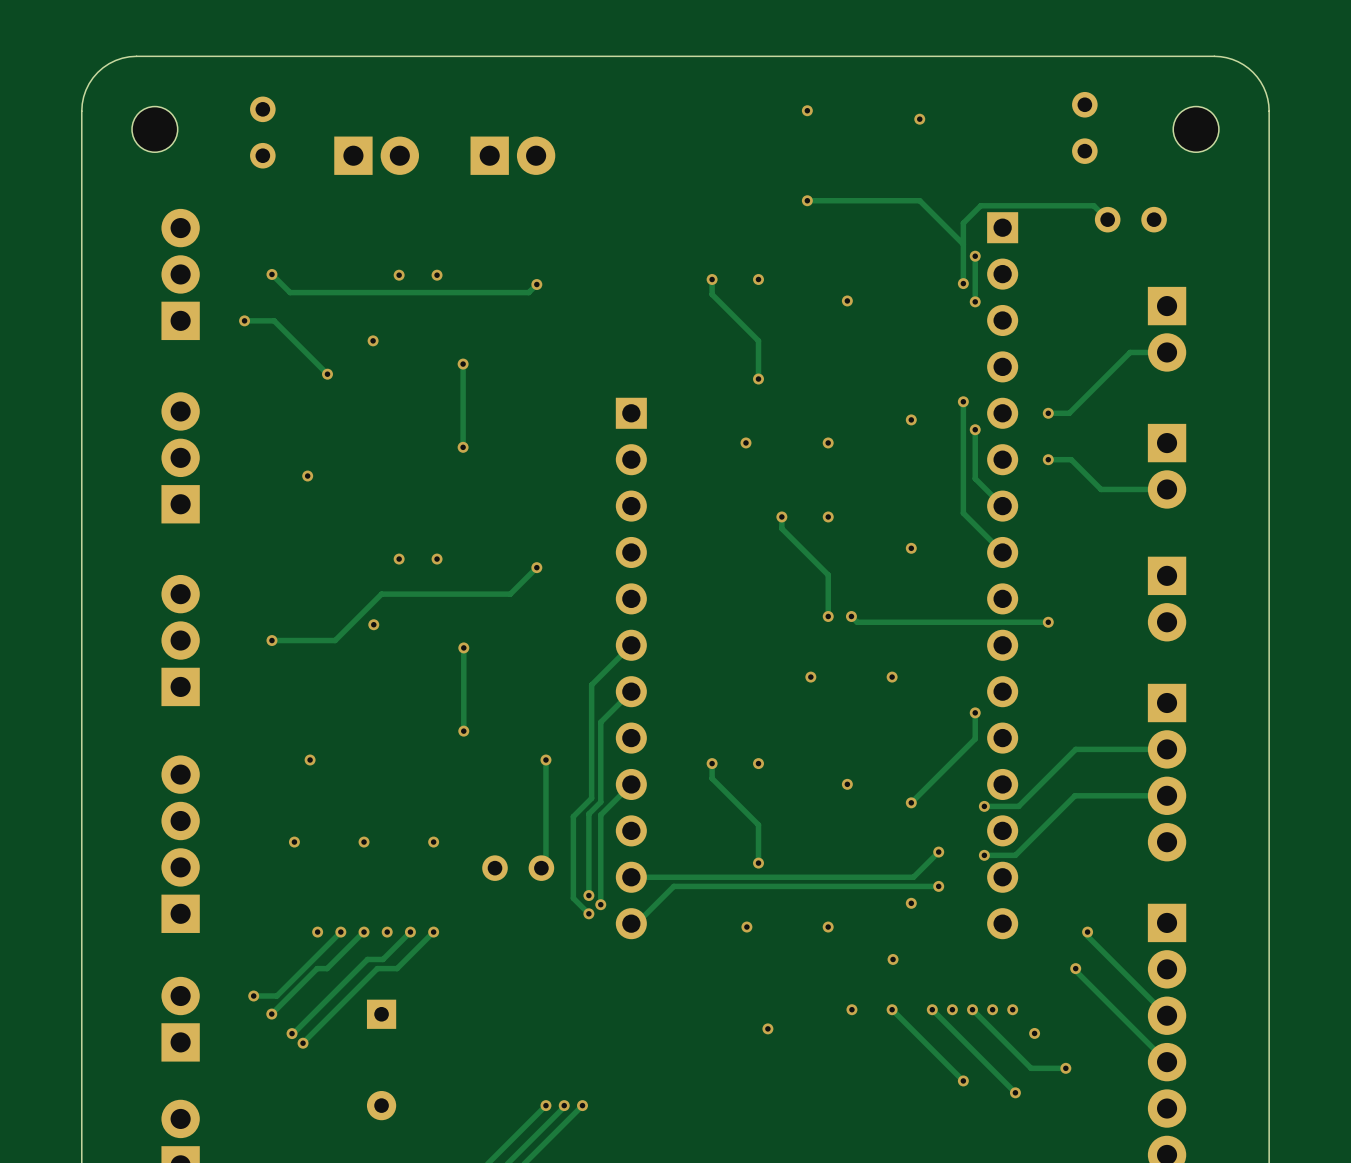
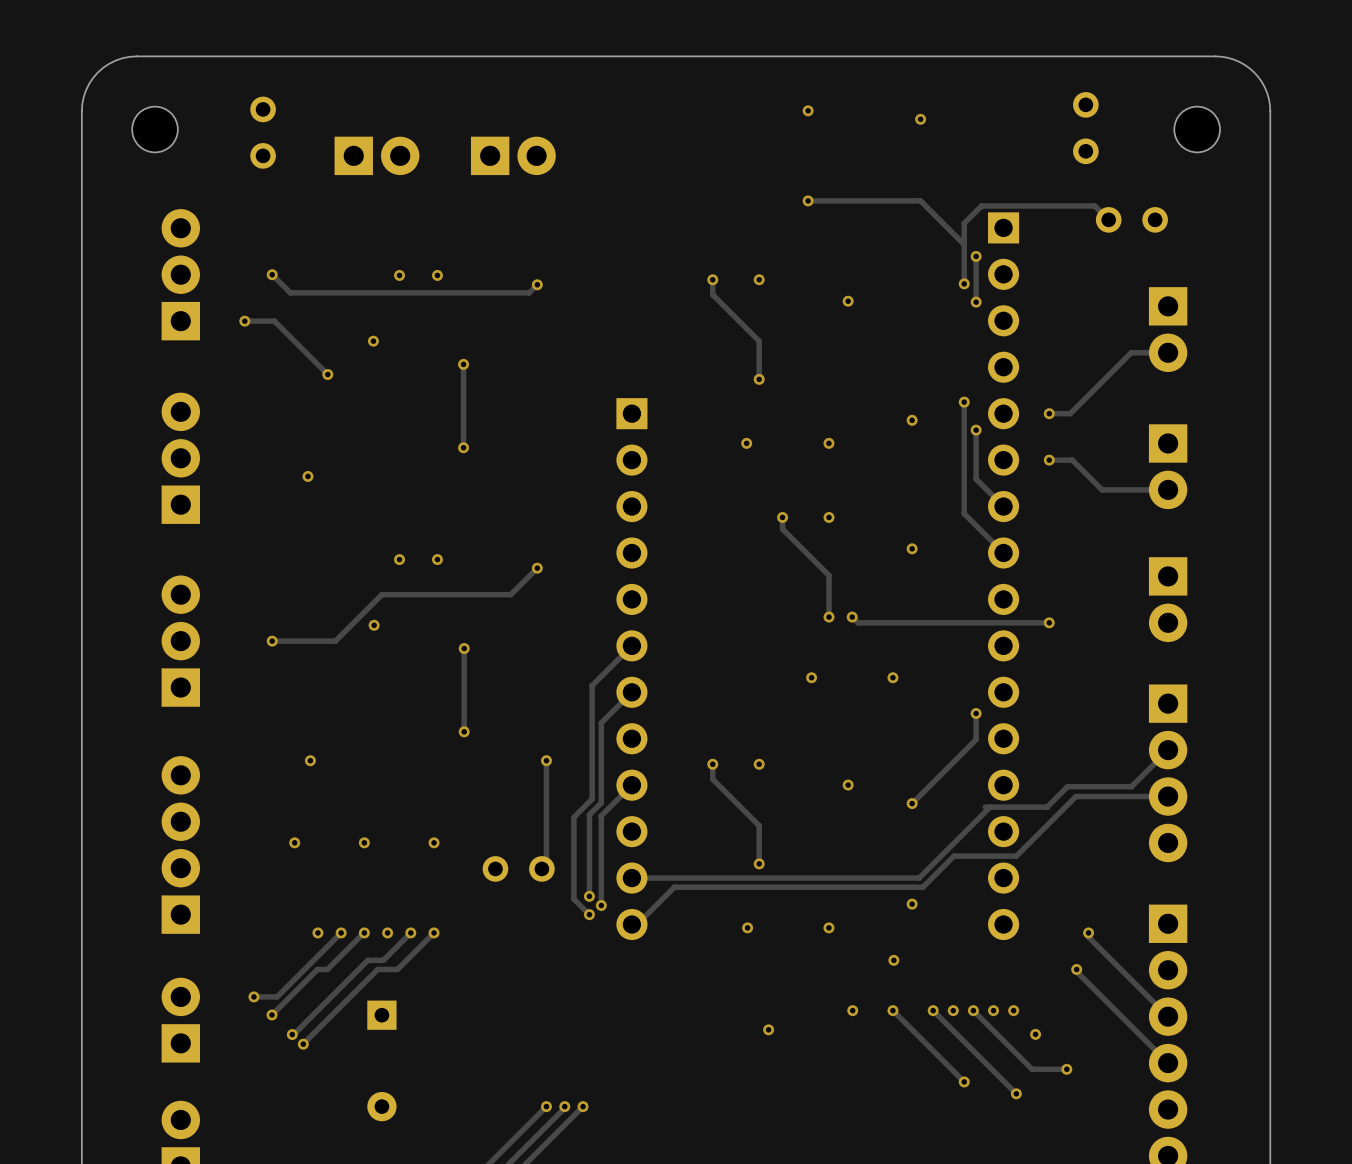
track: (1167, 749) (1075, 749) (1018, 806) -> (1168, 750) (1131, 786) (1067, 786) (1047, 807) (1019, 807)
via: (984, 806) -> none
track: (938, 852) (913, 877) -> (990, 807) (919, 878) (914, 878)
via: (938, 852) -> none
via: (984, 855) -> none
track: (938, 886) (922, 886) -> (985, 856) (953, 856) (922, 887)
via: (938, 886) -> none

